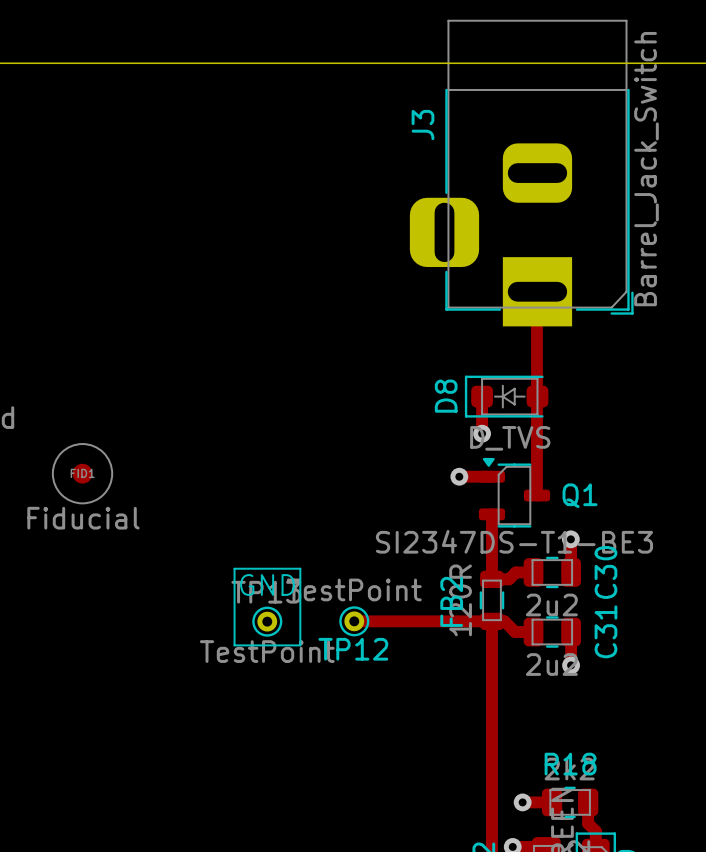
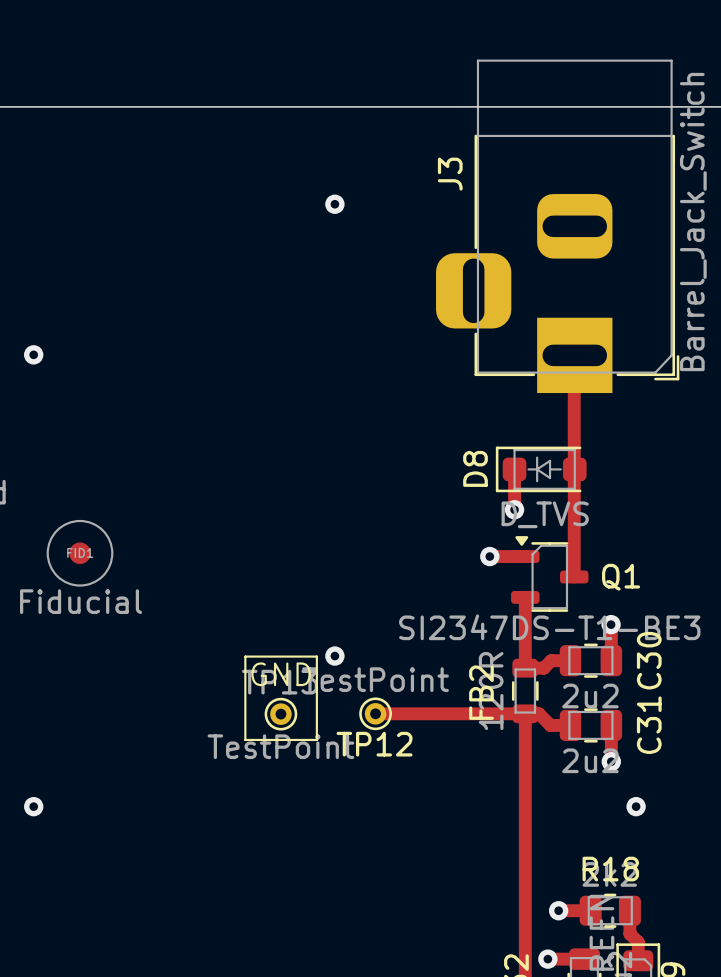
via: none -> (334, 204)
via: none -> (33, 354)
via: none -> (334, 656)
via: none -> (33, 806)
via: none -> (636, 806)

